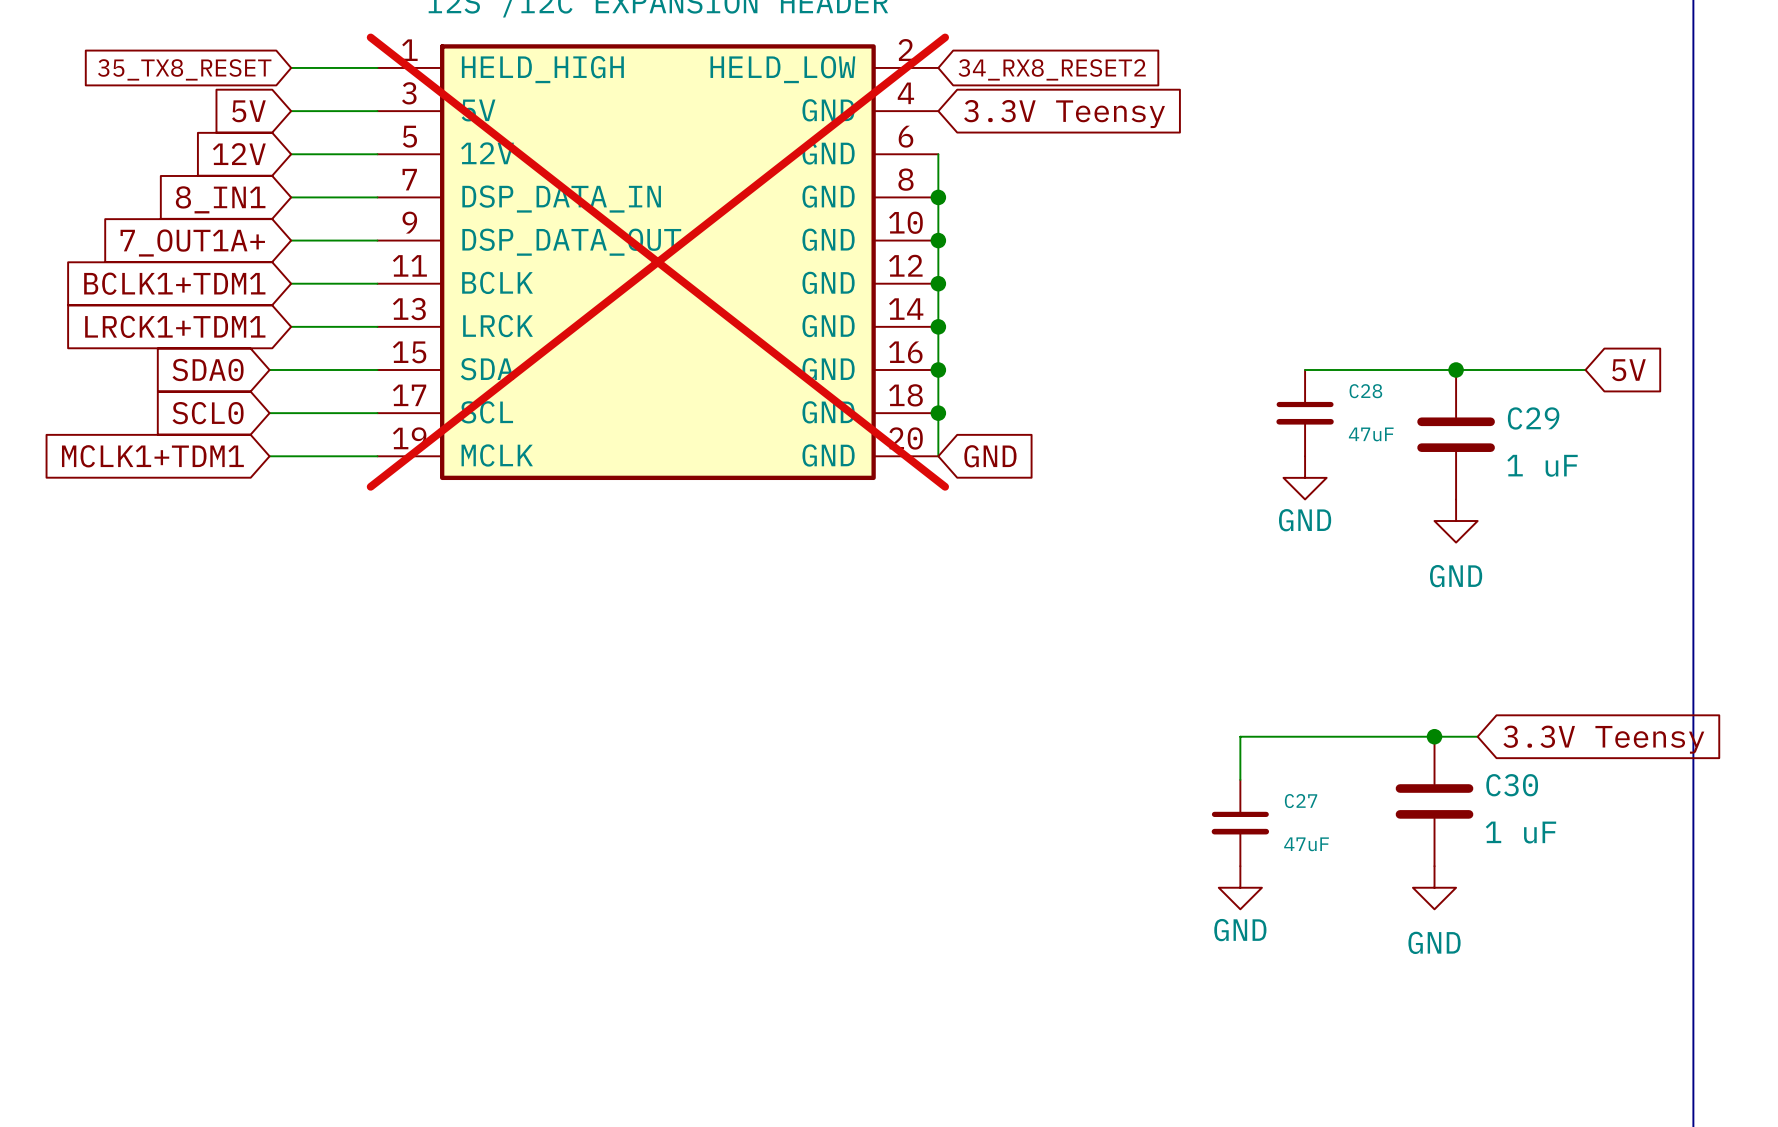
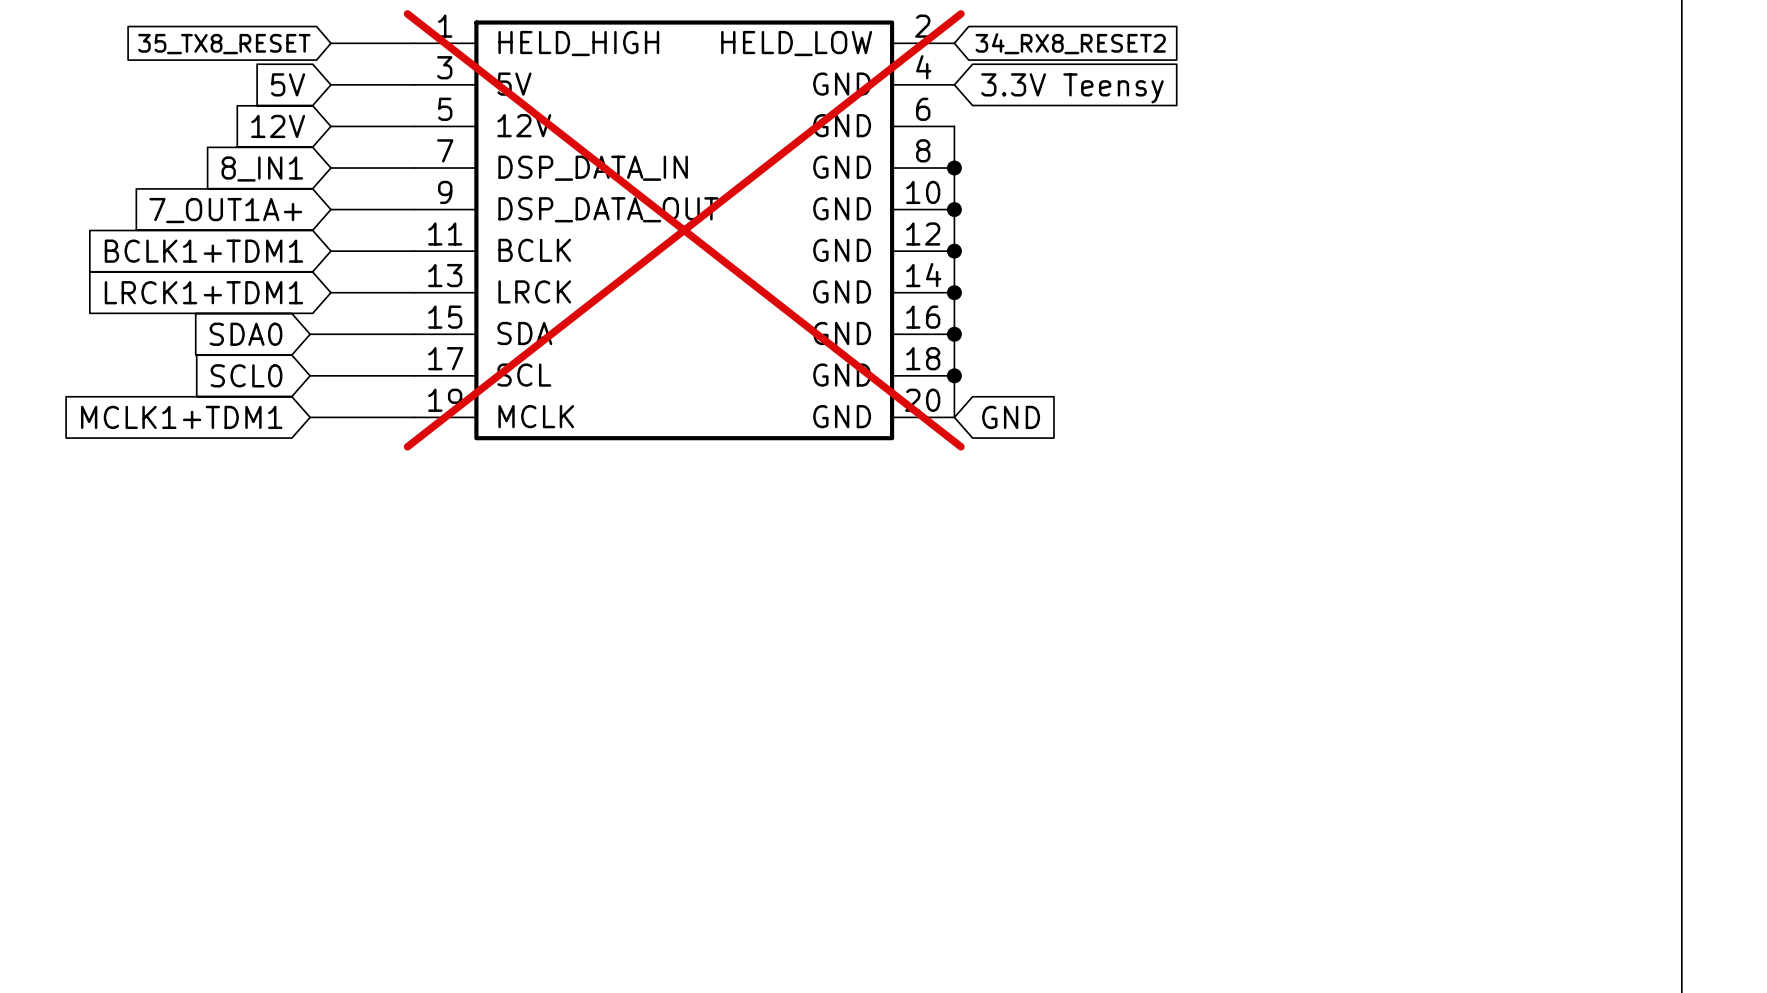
wire: (1305, 370) (1585, 370) -> none
junction: (1456, 370) -> none
global label: 5V (1628, 370) -> none
C28: 47uF (1305, 413) -> none
C29: 1 uF (1456, 434) -> none
power symbol: GND (1305, 477) -> none
power symbol: GND (1456, 521) -> none
junction: (1434, 736) -> none
wire: (1477, 736) (1240, 736) (1240, 779) -> none
global label: 3.3V Teensy (1603, 739) -> none
C30: 1 uF (1434, 801) -> none
C27: 47uF (1240, 823) -> none
power symbol: GND (1240, 887) -> none
power symbol: GND (1434, 887) -> none

